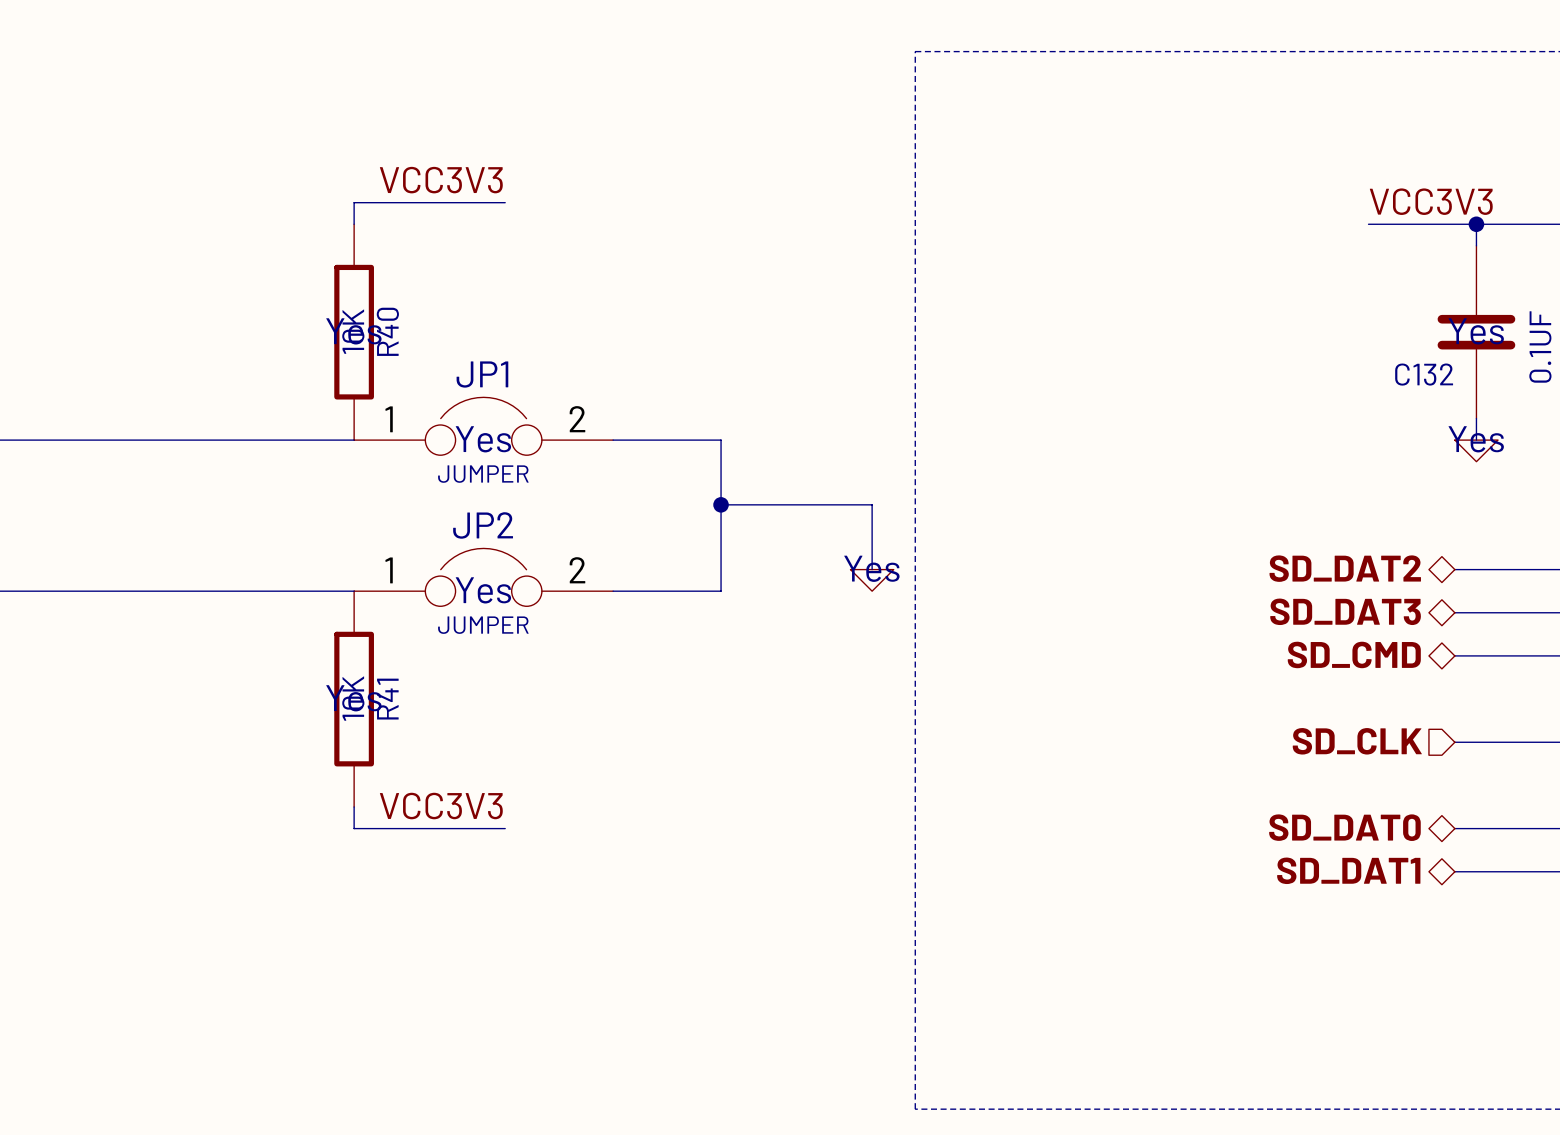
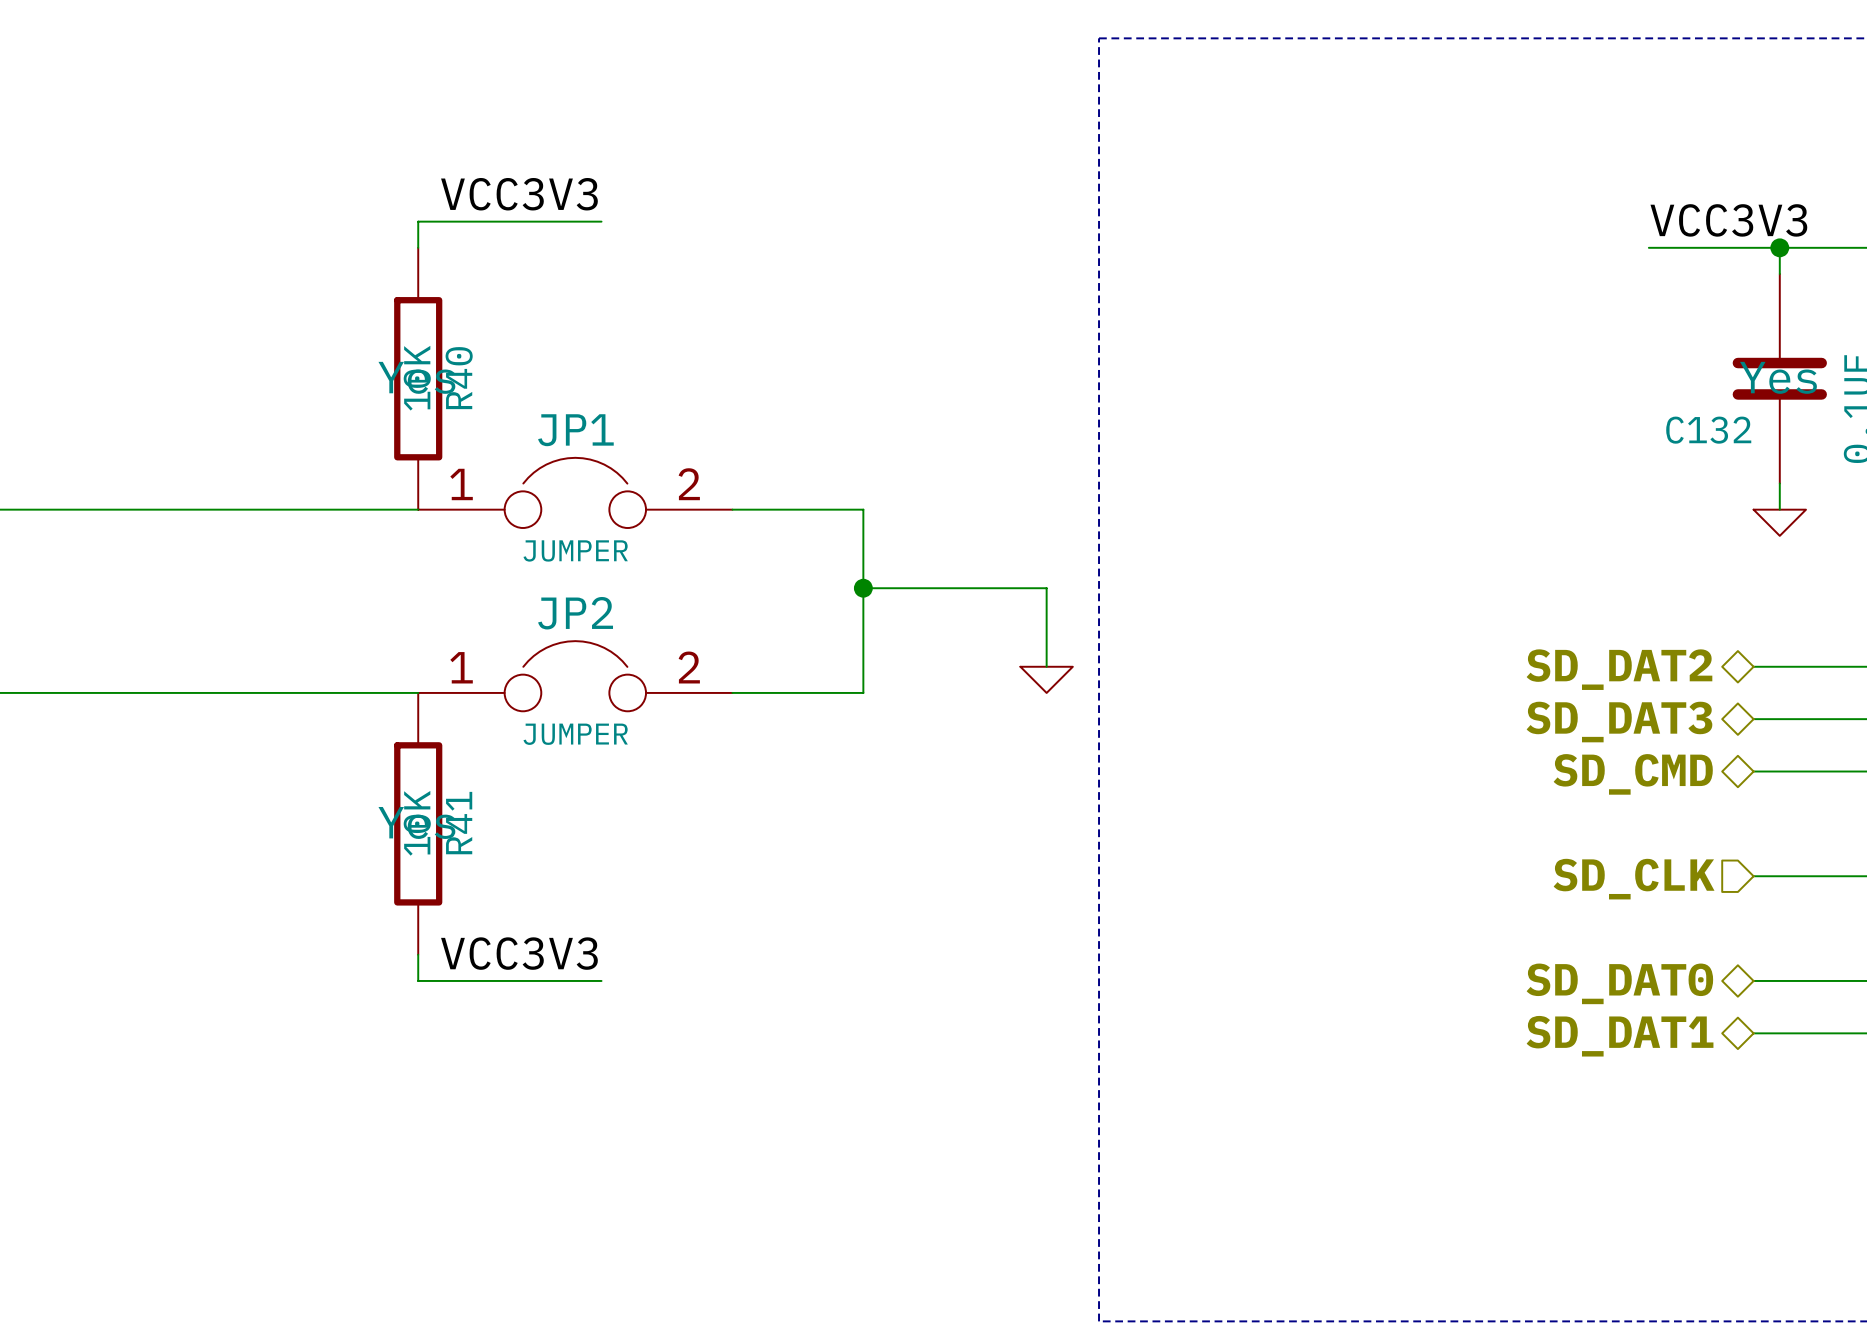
JP1 text: Yes (483, 439) -> none
power symbol text: Yes (1476, 439) -> none
power symbol text: Yes (871, 568) -> none
JP2 text: Yes (483, 590) -> none

